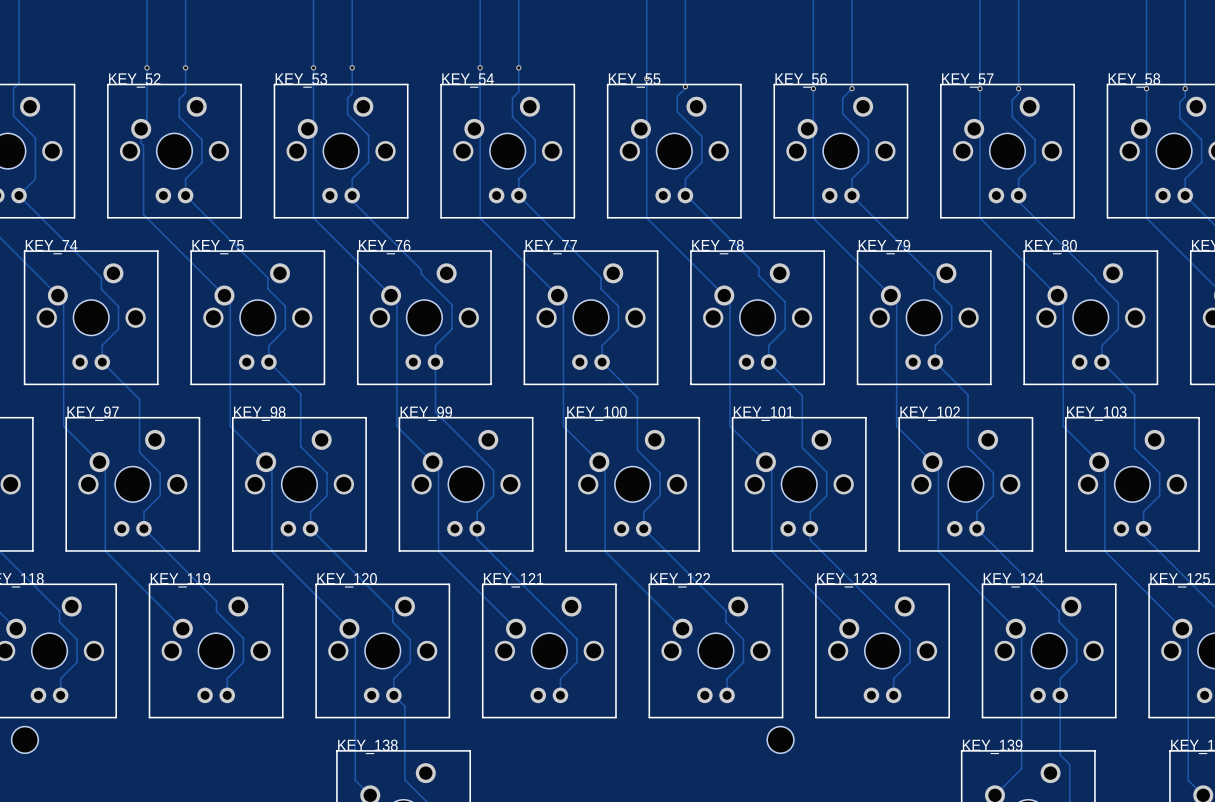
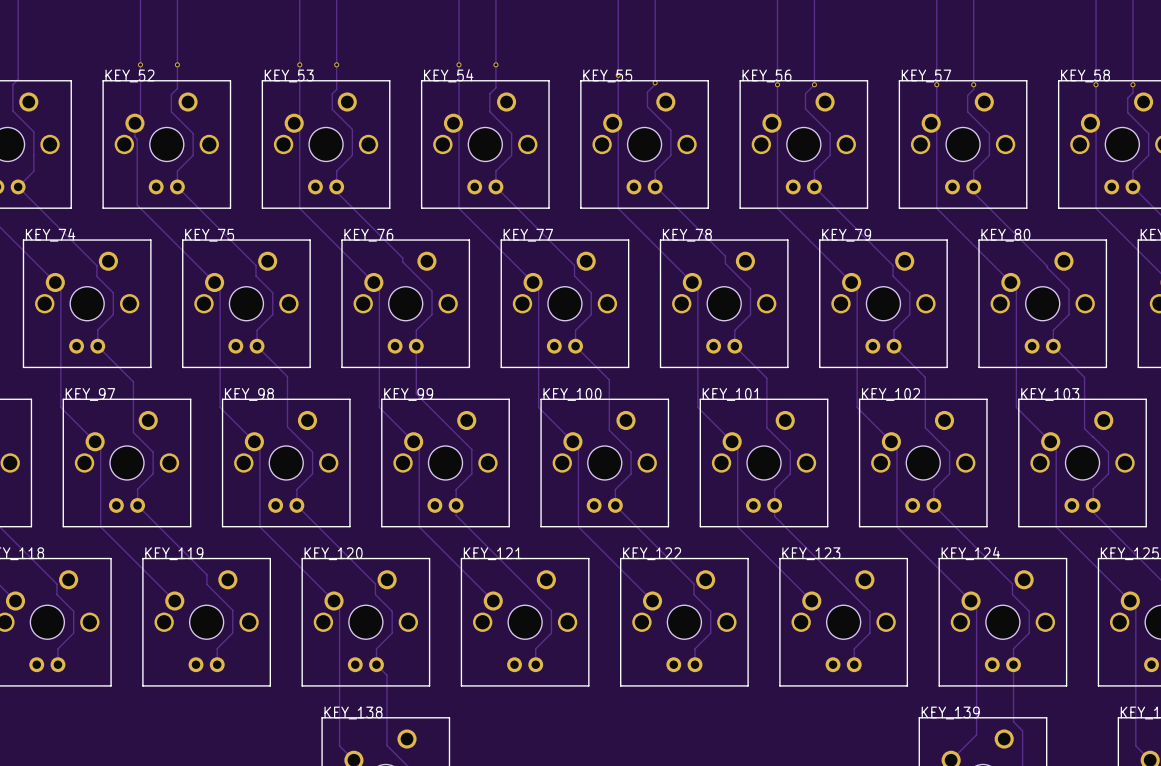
hole: (24, 739) -> none
hole: (780, 739) -> none

